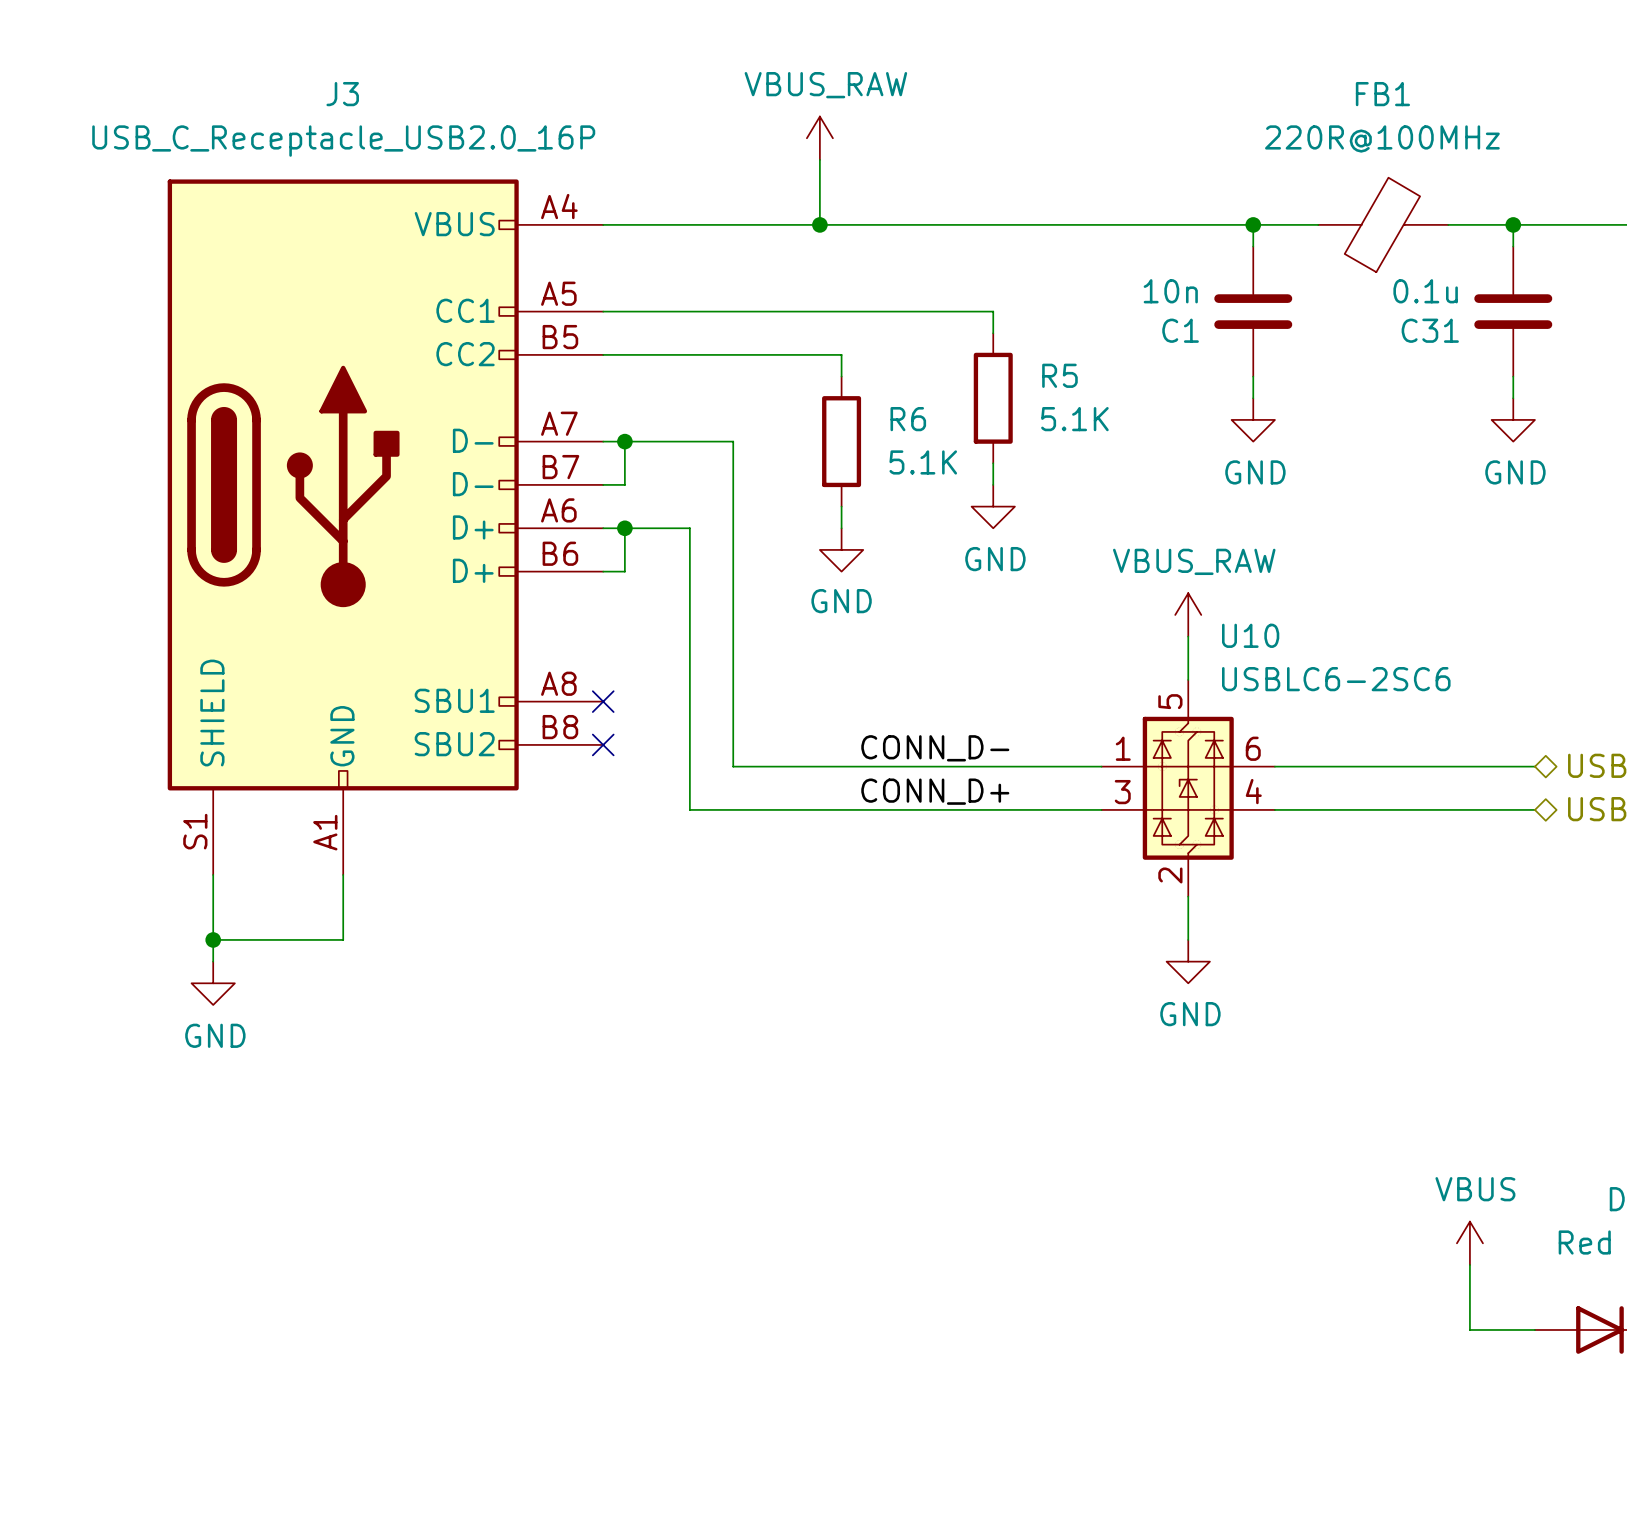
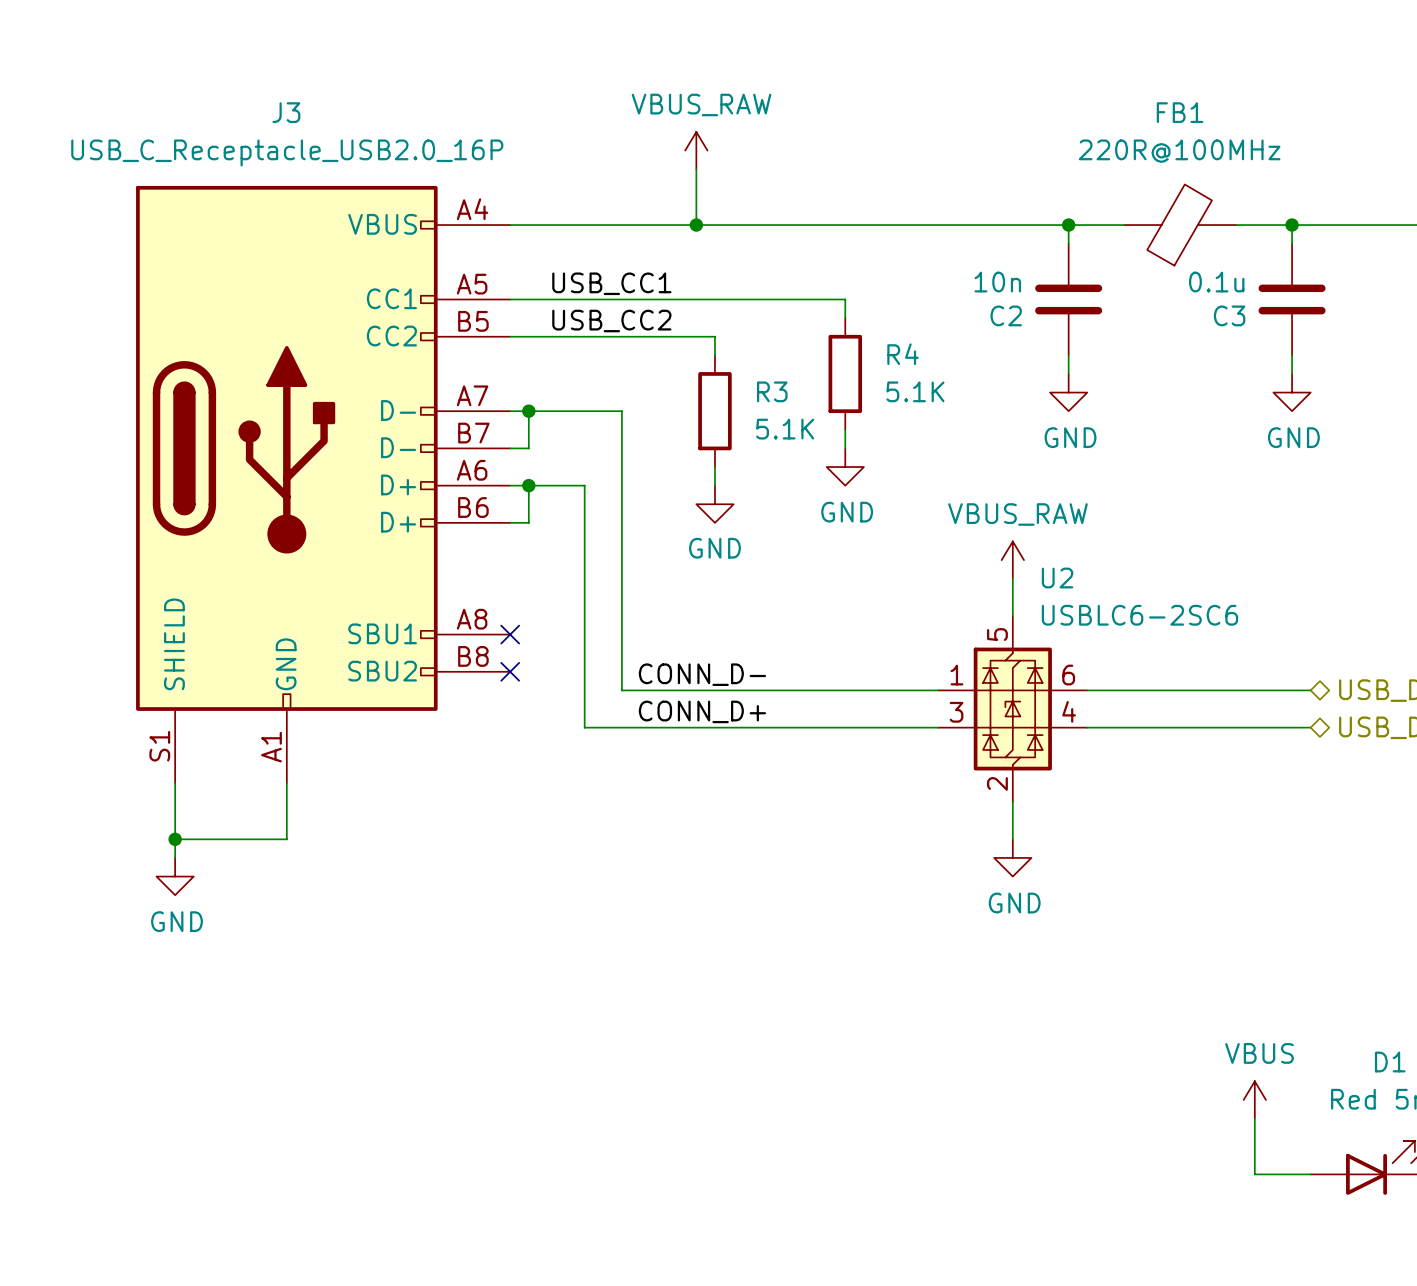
label: none -> USB_CC1 (611, 283)
C1 name: C1 (1180, 330) -> C2 (1006, 315)
C31 name: C31 (1430, 330) -> C3 (1229, 315)
label: none -> USB_CC2 (611, 320)
R5 name: R5 (1059, 375) -> R4 (903, 354)
R6 name: R6 (908, 419) -> R3 (772, 391)
U10 name: U10 (1250, 635) -> U2 (1057, 578)
label position: CONN_D- (935, 748) -> CONN_D- (702, 674)
label position: CONN_D+ (935, 791) -> CONN_D+ (702, 711)

